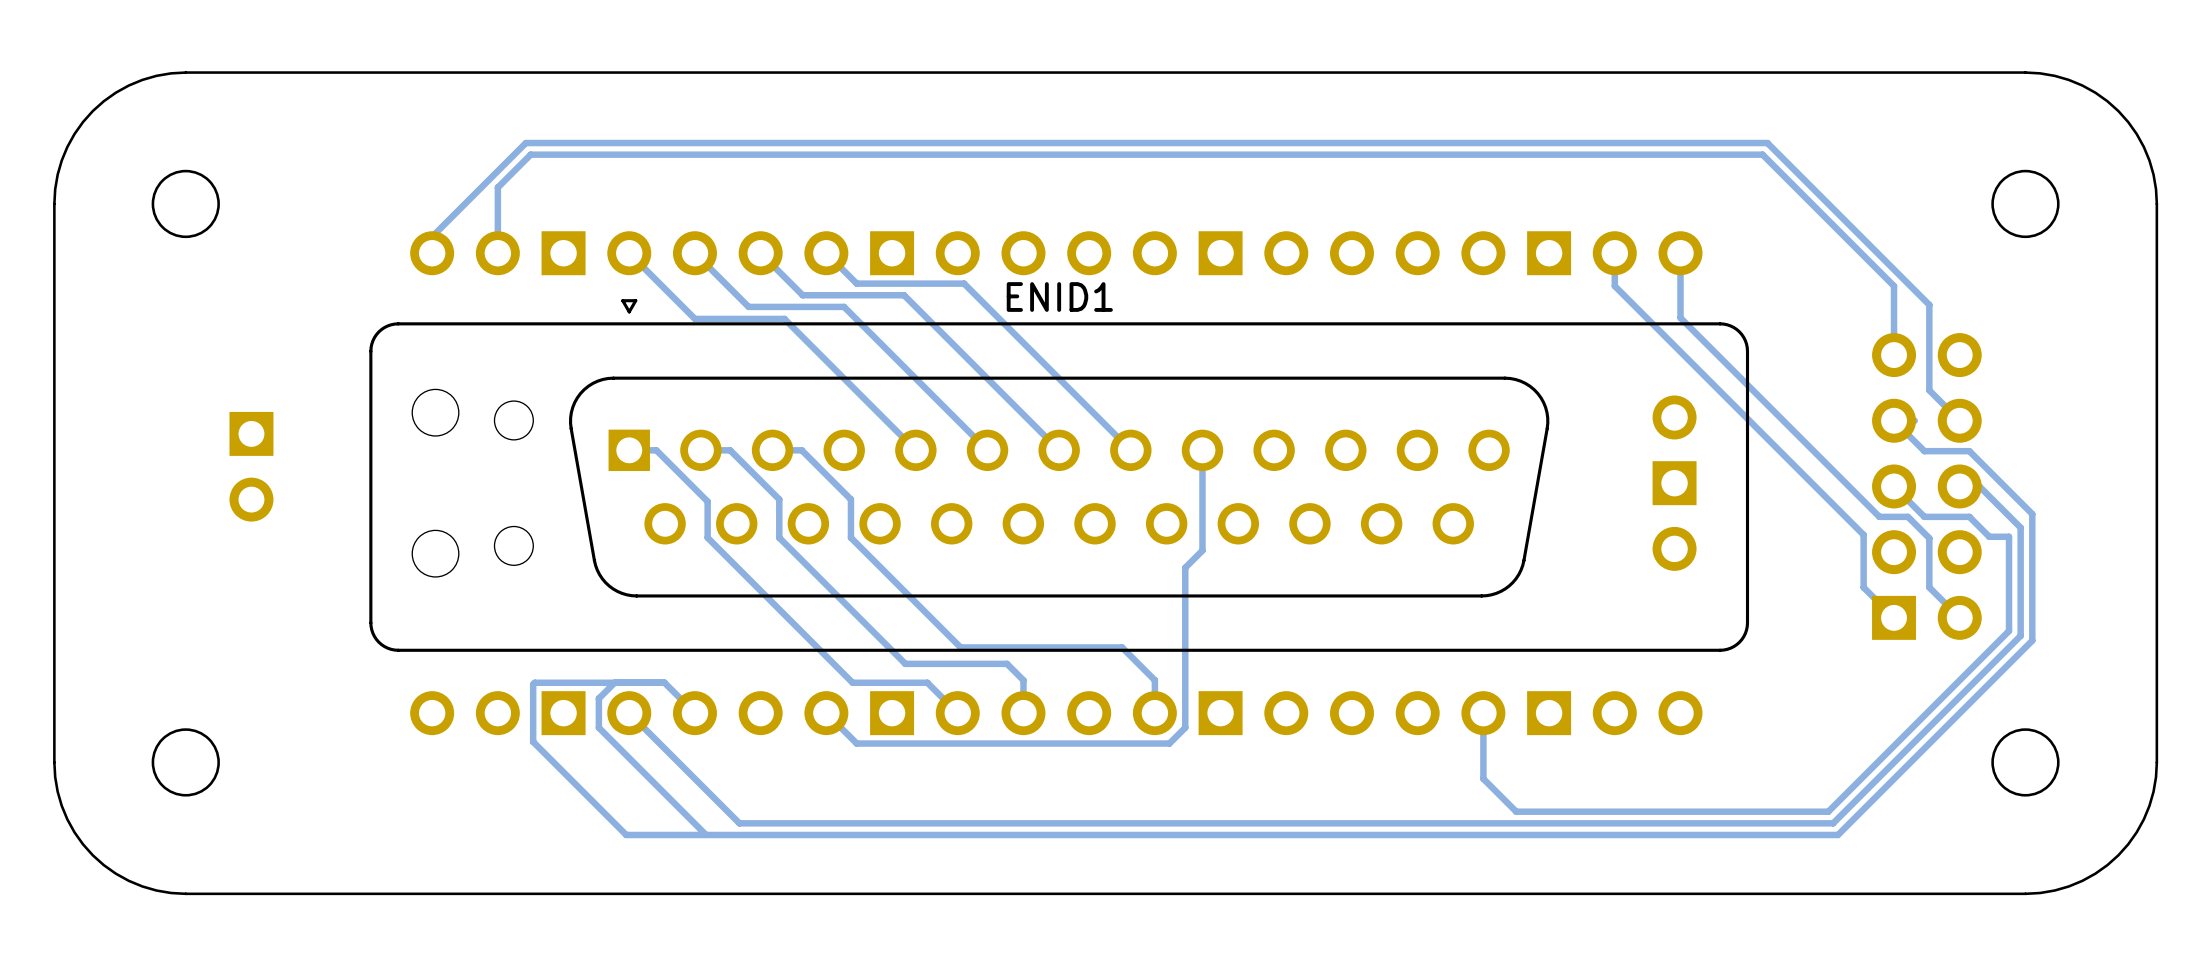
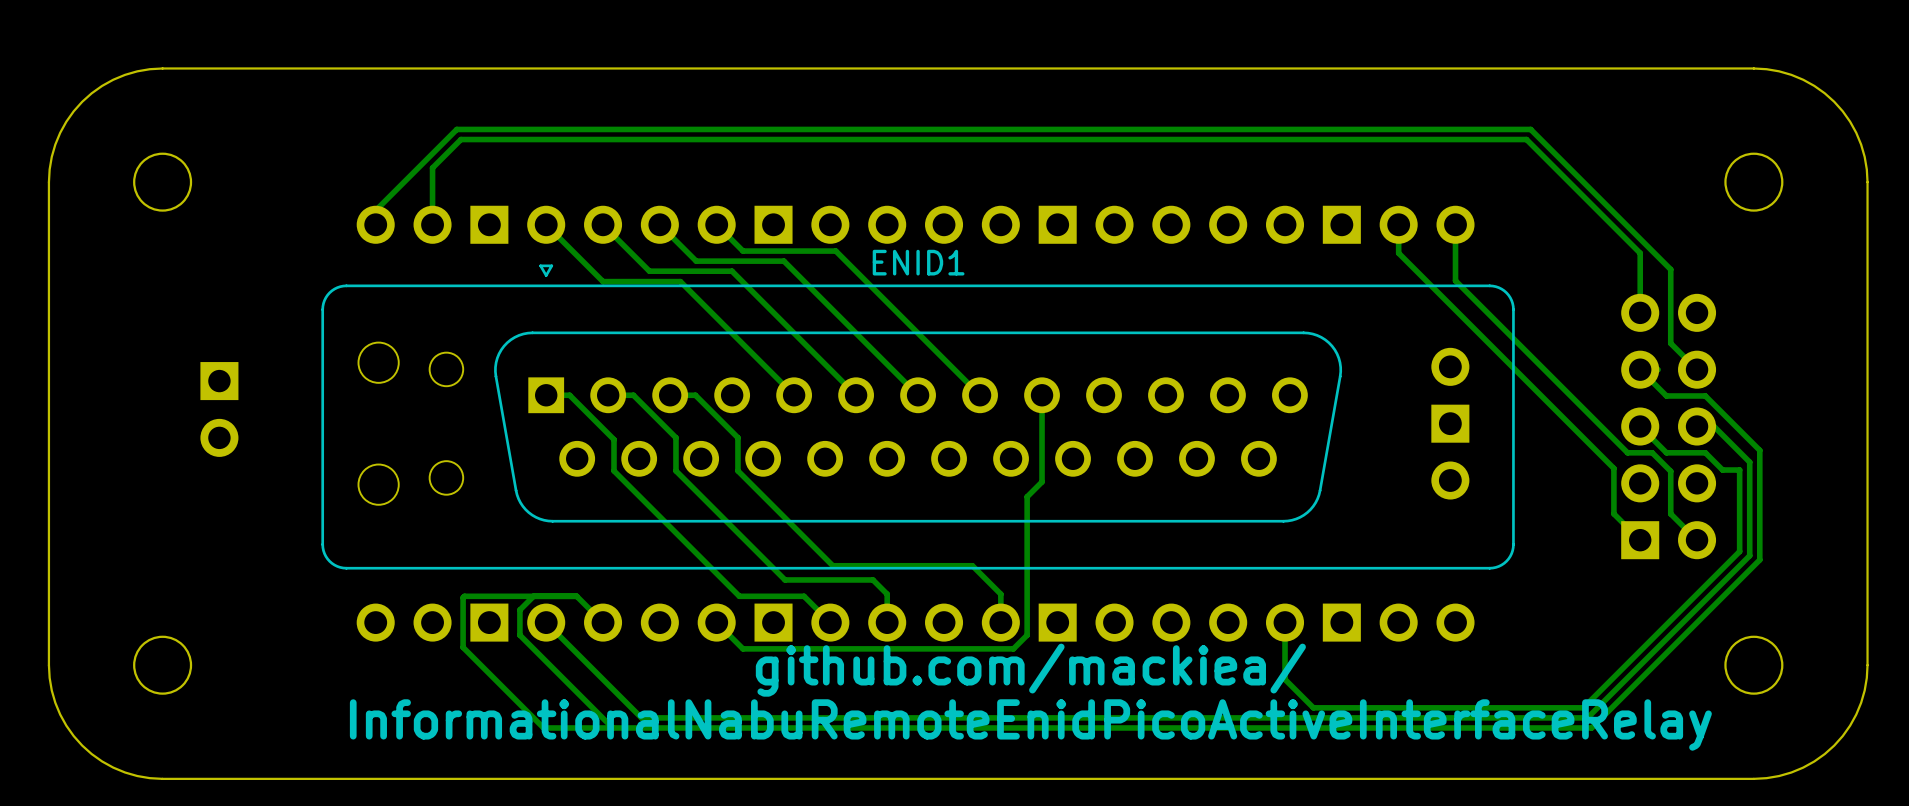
text: none -> github.com/mackiea/ (1030, 670)
text: none -> InformationalNabuRemoteEnidPicoActiveInterfaceRelay (1030, 724)

